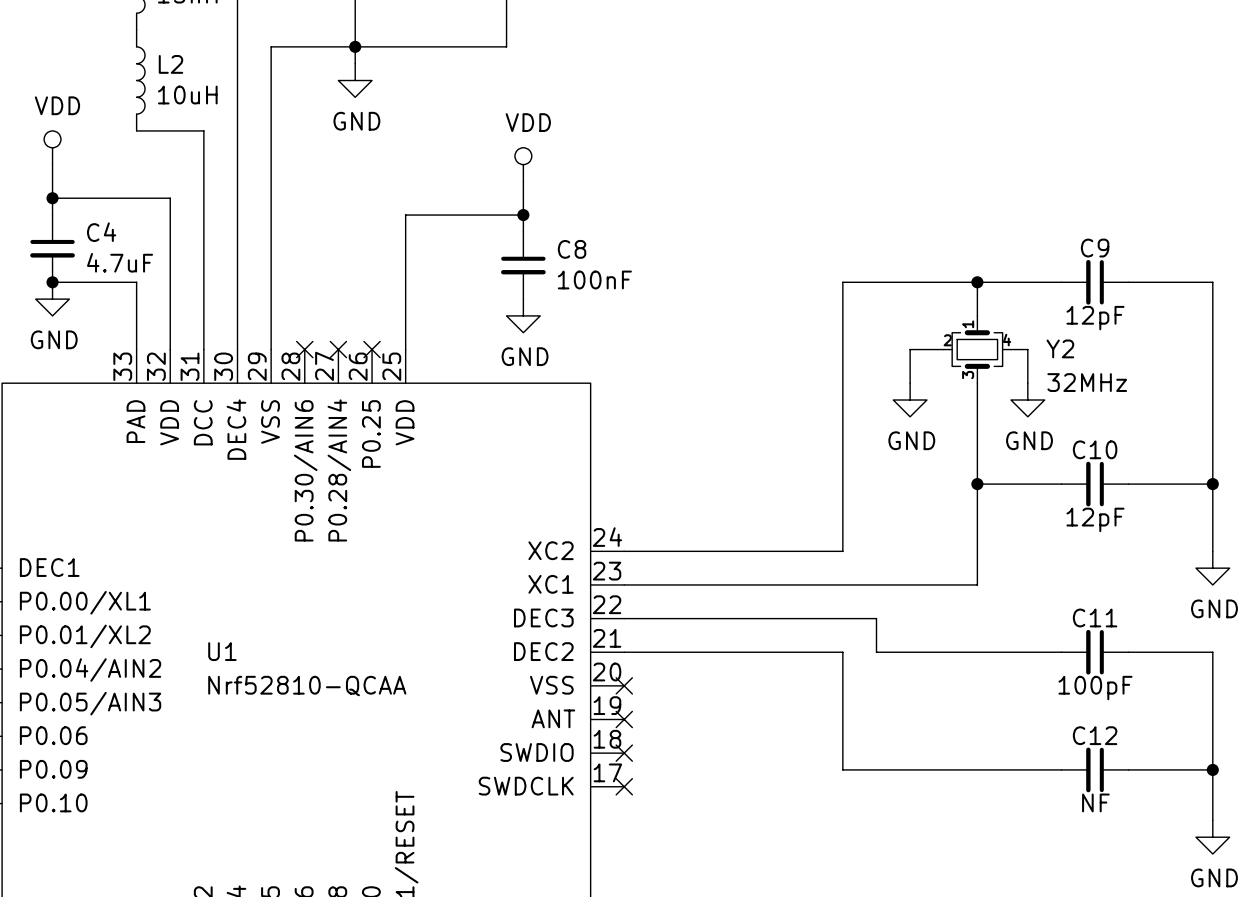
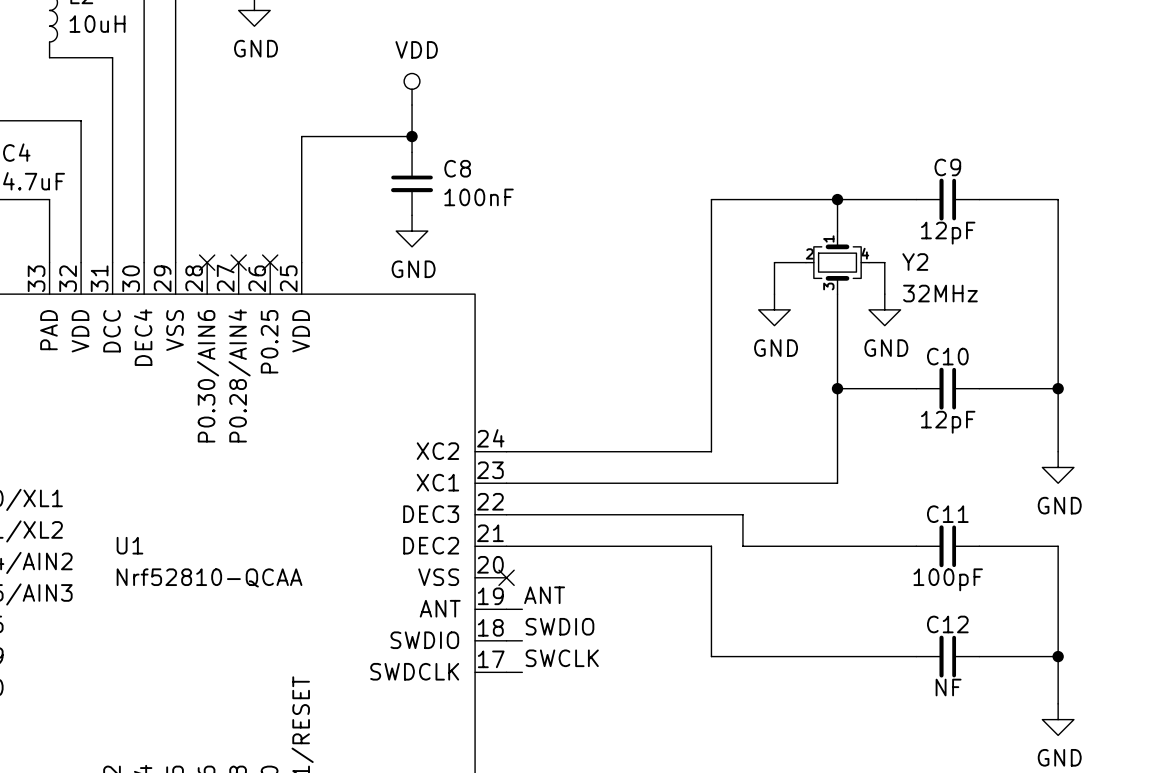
label: none -> ANT (544, 595)
wire: none -> (506, 609) (522, 609)
no-connect mark: (624, 719) -> none
label: none -> SWDIO (559, 626)
wire: none -> (506, 640) (522, 640)
no-connect mark: (624, 753) -> none
label: none -> SWCLK (562, 658)
wire: none -> (506, 672) (522, 672)
no-connect mark: (624, 786) -> none

